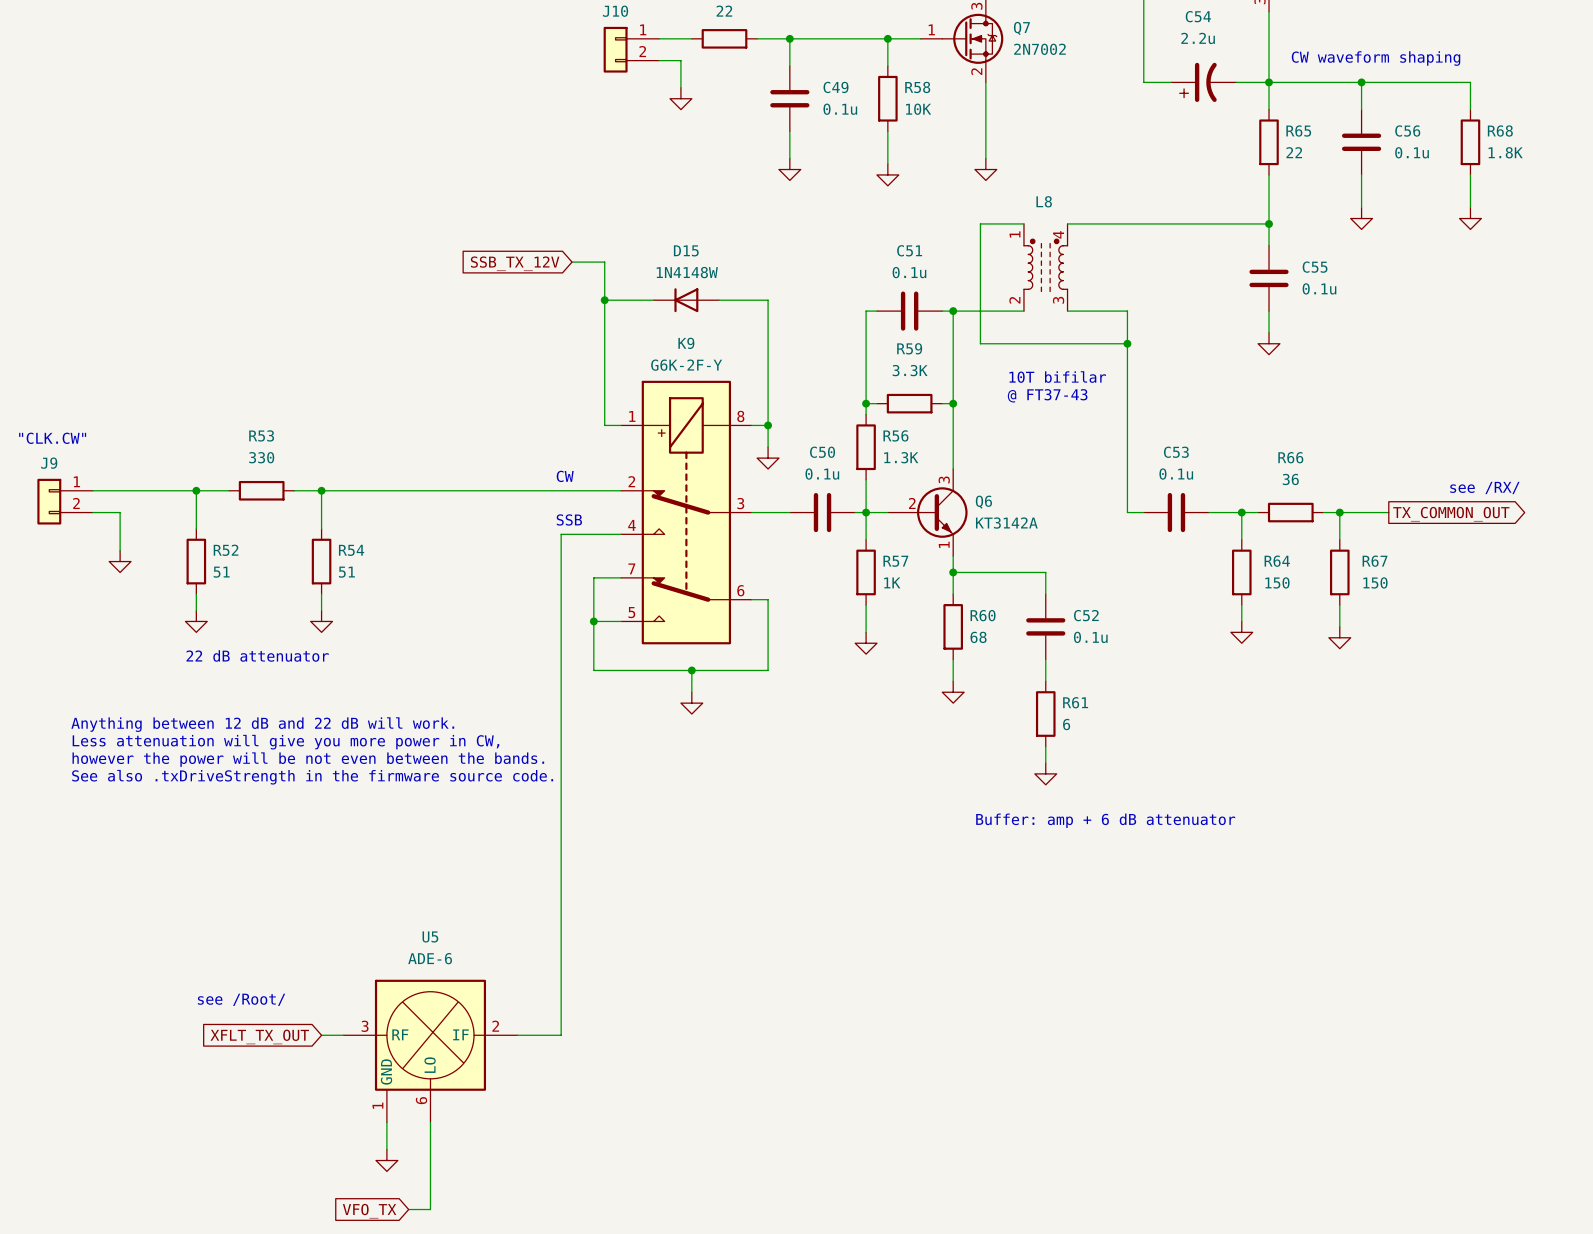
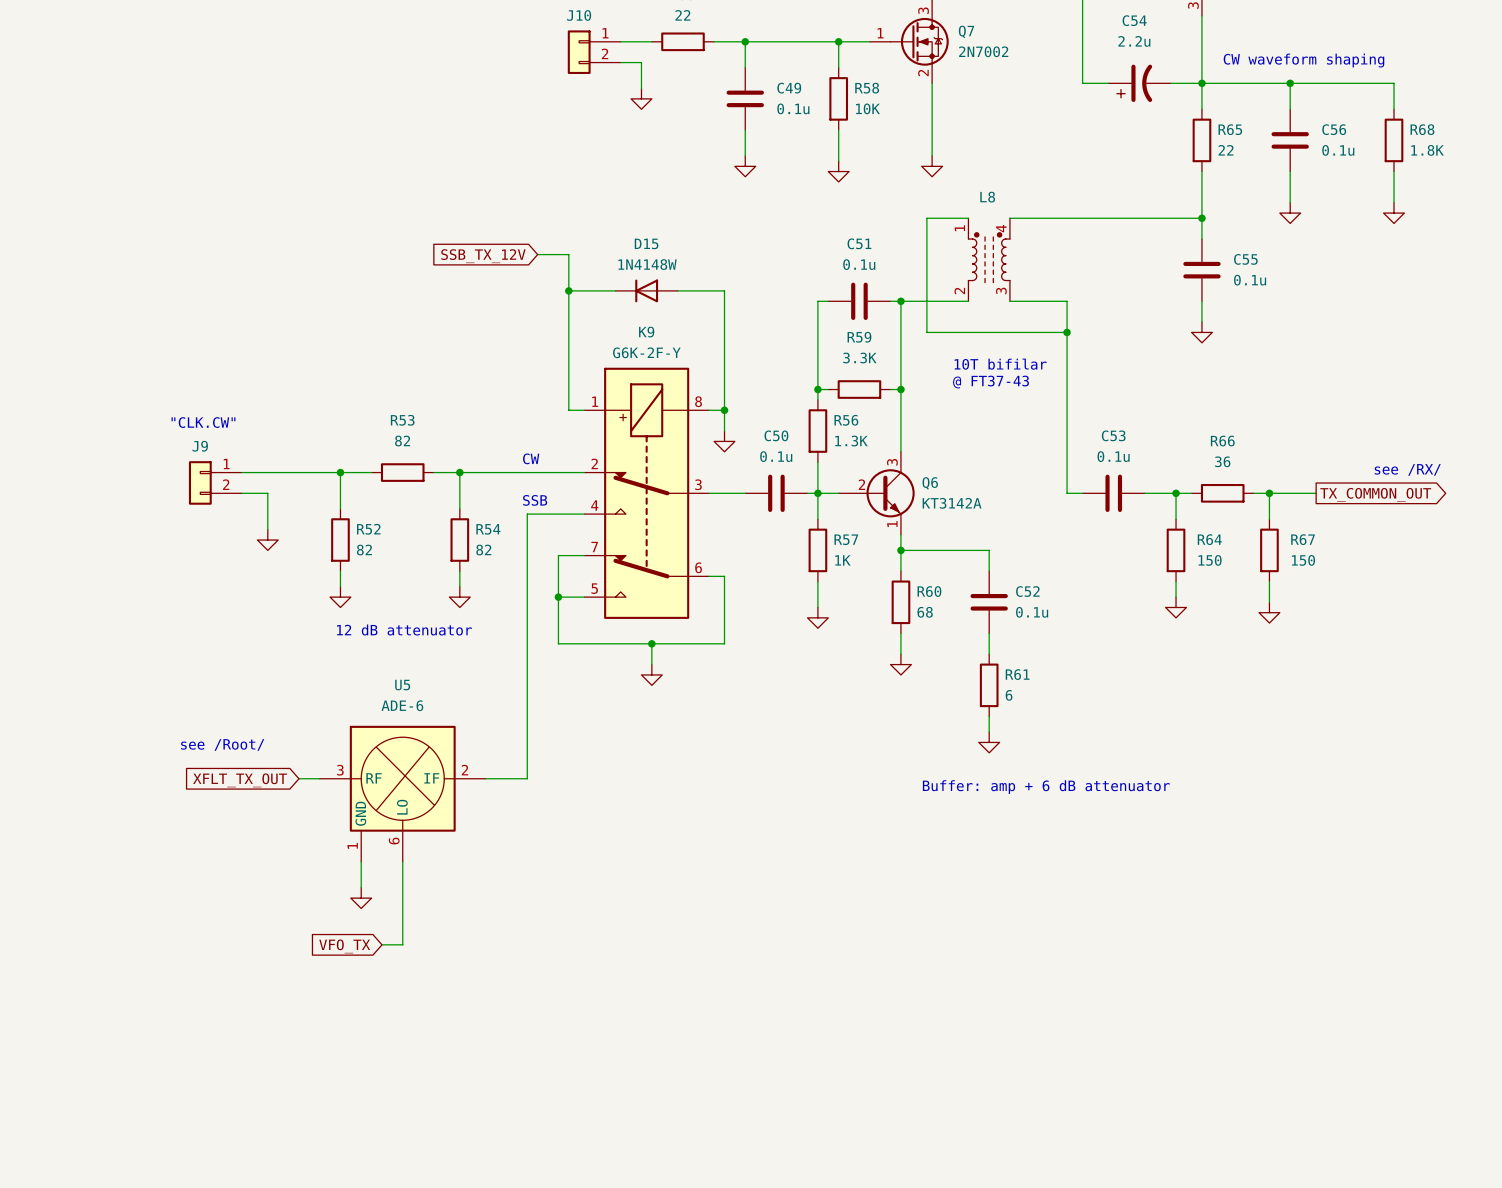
text position: "CLK.CW" (52, 438) -> "CLK.CW" (203, 422)
R53 value: 330 (261, 457) -> 82 (402, 441)
wire: (92, 490) (229, 490) -> none
wire: (196, 490) (196, 528) -> (340, 472) (340, 508)
junction: (196, 490) -> none
wire: none -> (241, 472) (272, 472)
R53 position: (261, 490) -> (402, 472)
wire: (321, 490) (321, 528) -> (459, 472) (459, 508)
junction position: (321, 490) -> (340, 472)
wire: (397, 490) (463, 490) -> none
junction: none -> (459, 472)
J9 position: (65, 501) -> (215, 482)
wire: (92, 512) (120, 512) (120, 550) -> (241, 493) (267, 493) (267, 529)
power symbol: (120, 561) -> none
R52 position: (196, 561) -> (340, 540)
power symbol: none -> (267, 540)
R54 position: (321, 561) -> (459, 540)
R52 value: 51 (221, 572) -> 82 (364, 550)
R54 value: 51 (346, 572) -> 82 (483, 550)
wire: (196, 594) (196, 610) -> (340, 571) (340, 586)
wire: (321, 594) (321, 610) -> (459, 571) (459, 586)
power symbol: (196, 621) -> none
power symbol: (321, 621) -> none
power symbol: none -> (340, 597)
power symbol: none -> (459, 597)
text: 22 dB attenuator (257, 655) -> none
text: none -> 12 dB attenuator (404, 630)
text: Anything between 12 dB and 22 dB will work. (262, 724) -> none
text: Less attenuation will give you more power in CW, (285, 742) -> none
text: however the power will be not even between the bands. (308, 759) -> none
text: none -> see /Root/ (222, 744)
text: See also .txDriveStrength in the firmware source code. (312, 777) -> none
wire: none -> (298, 778) (319, 778)
wire: (561, 812) (561, 1035) (517, 1035) -> (527, 778) (485, 778)
global label: none -> XFLT_TX_OUT (240, 780)
wire: none -> (361, 861) (361, 887)
wire: none -> (402, 861) (402, 944) (381, 944)
power symbol: none -> (361, 898)
global label: none -> VFO_TX (344, 946)
text: see /Root/ (241, 999) -> none
wire: (321, 1035) (343, 1035) -> none
global label: XFLT_TX_OUT (259, 1036) -> none
U5 position: (430, 1051) -> (402, 793)
wire: (386, 1122) (386, 1149) -> none
wire: (430, 1122) (430, 1209) (408, 1209) -> none
power symbol: (386, 1160) -> none
global label: VFO_TX (369, 1211) -> none

